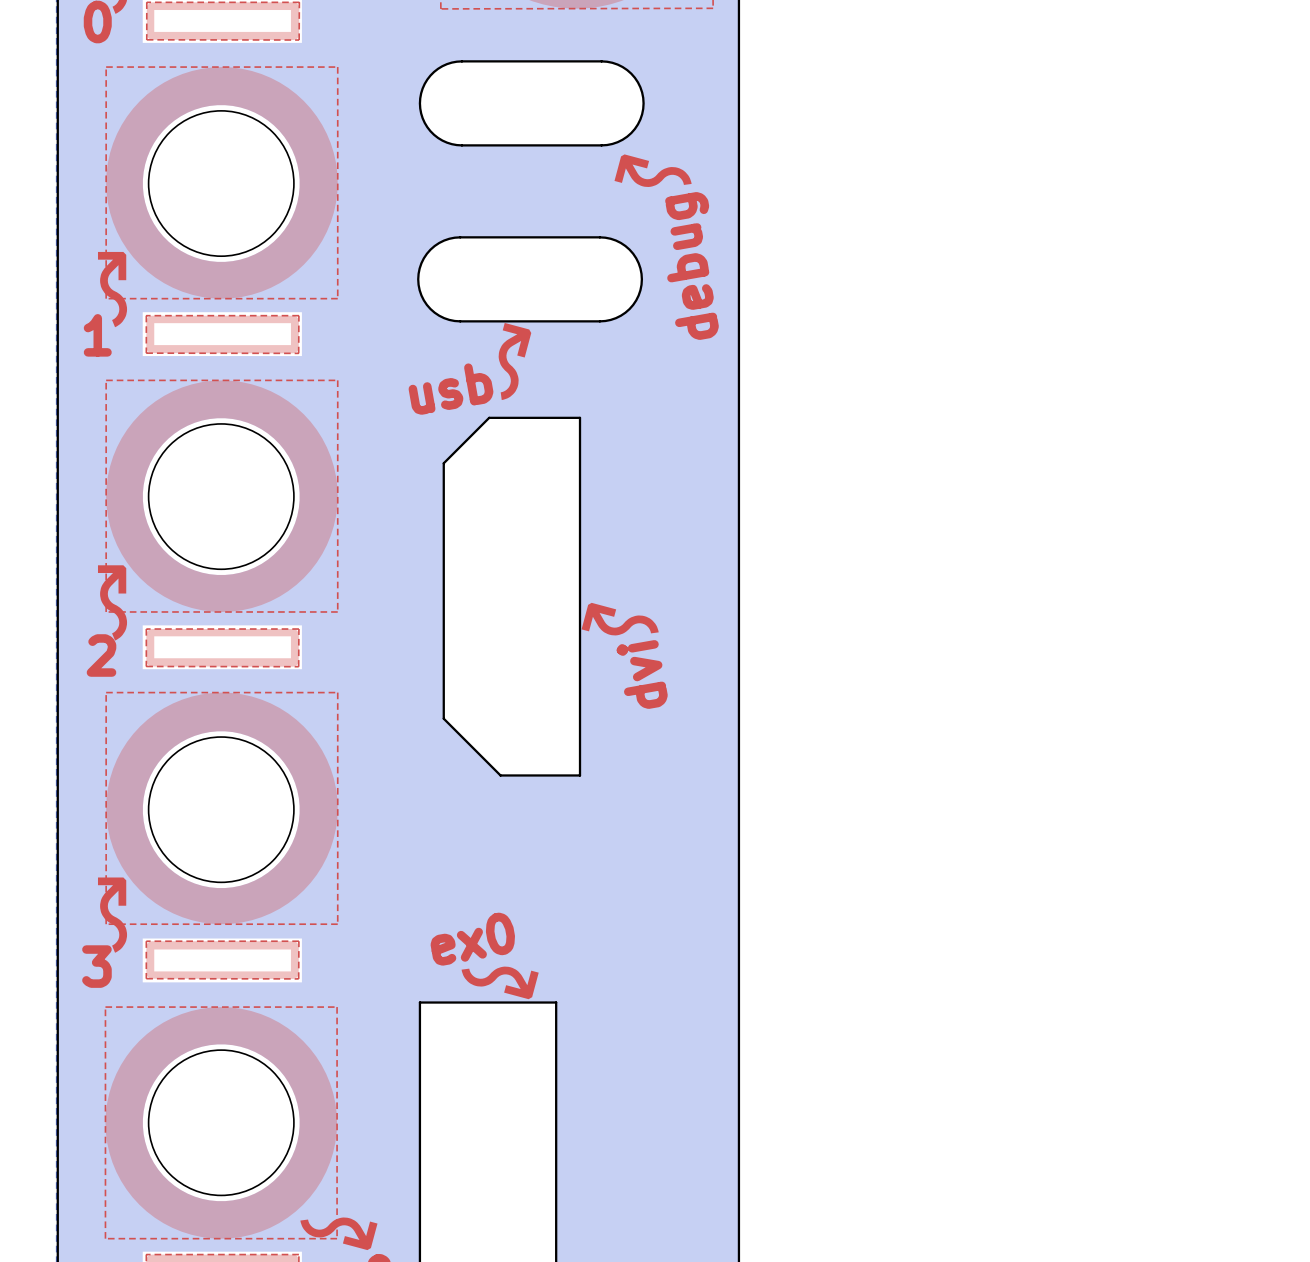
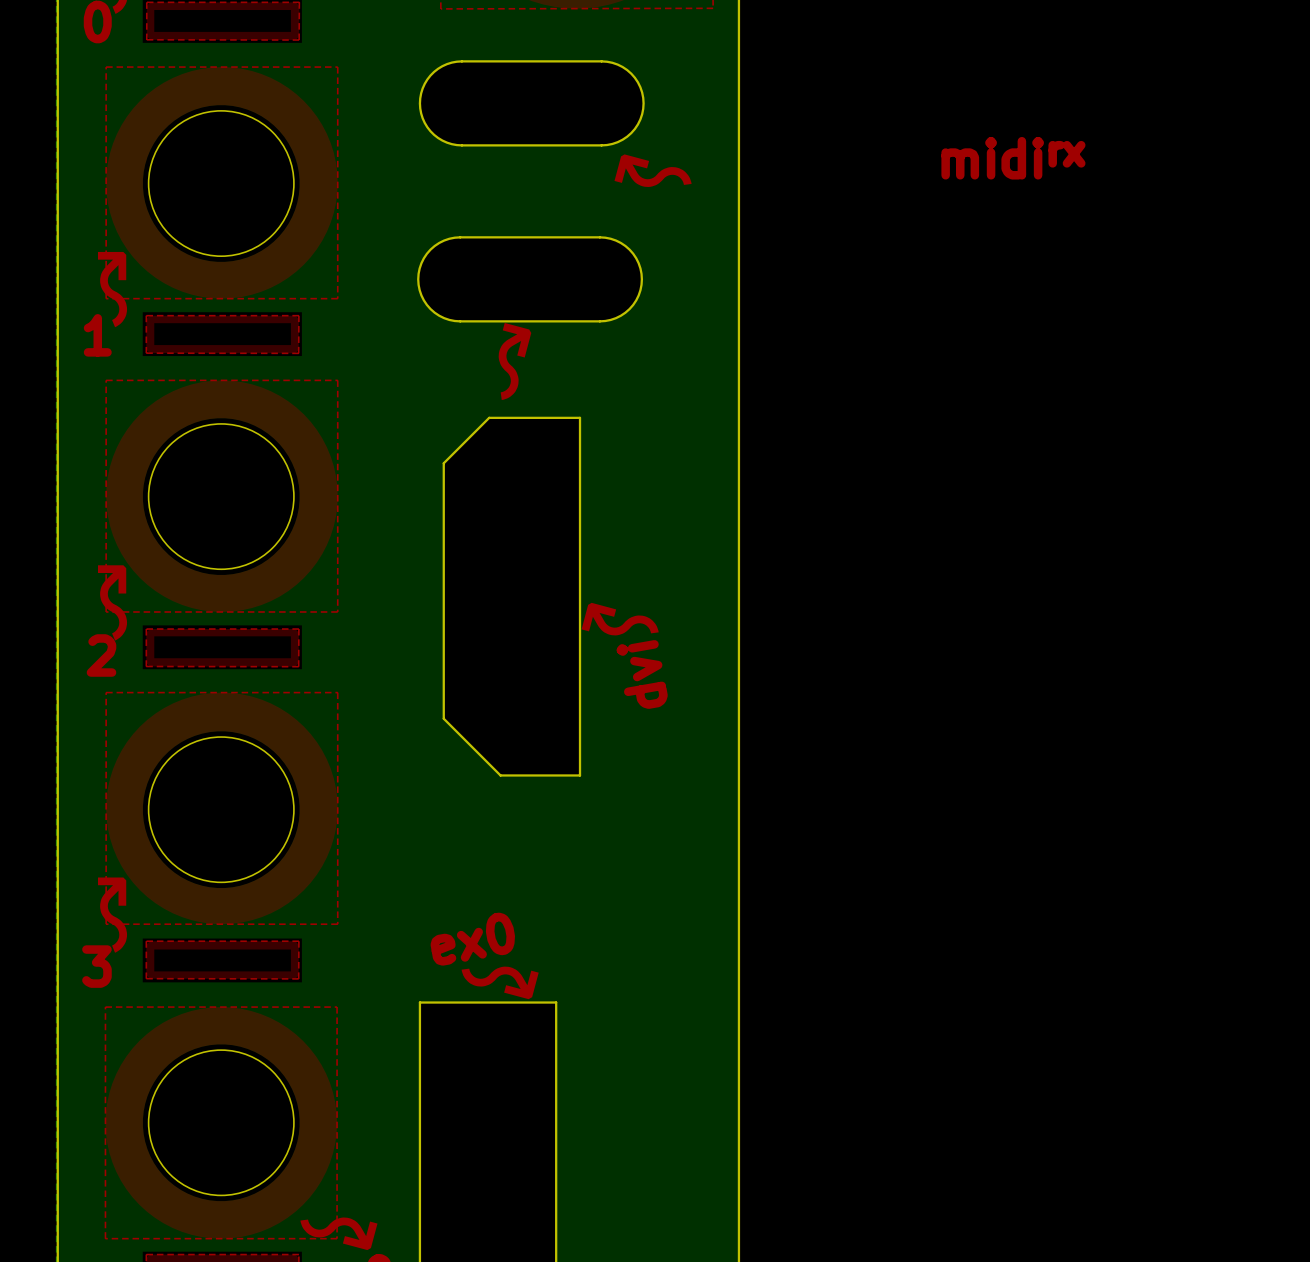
text: none -> midirx (1013, 158)
text: debug (692, 265) -> none
text: usb (451, 389) -> none

